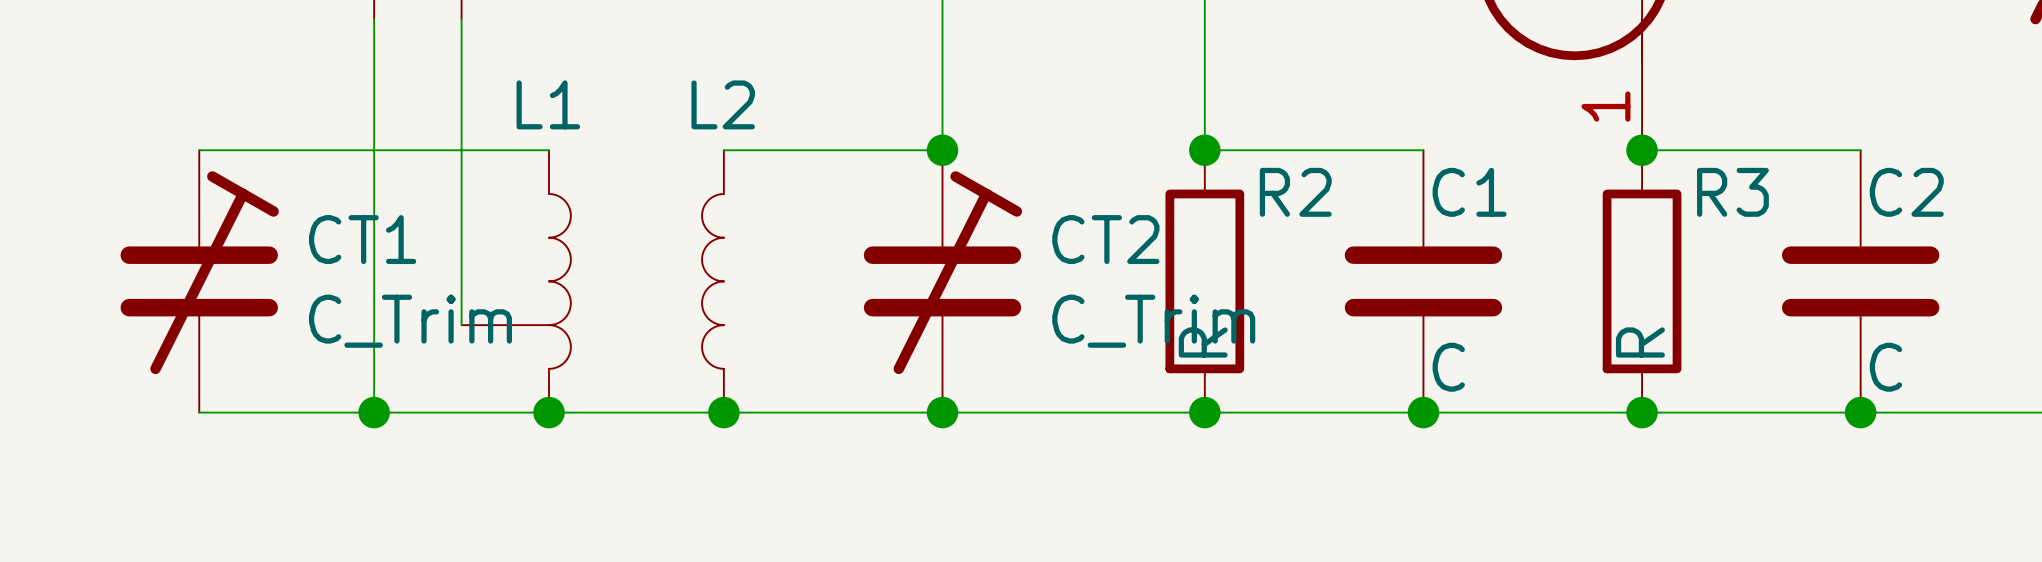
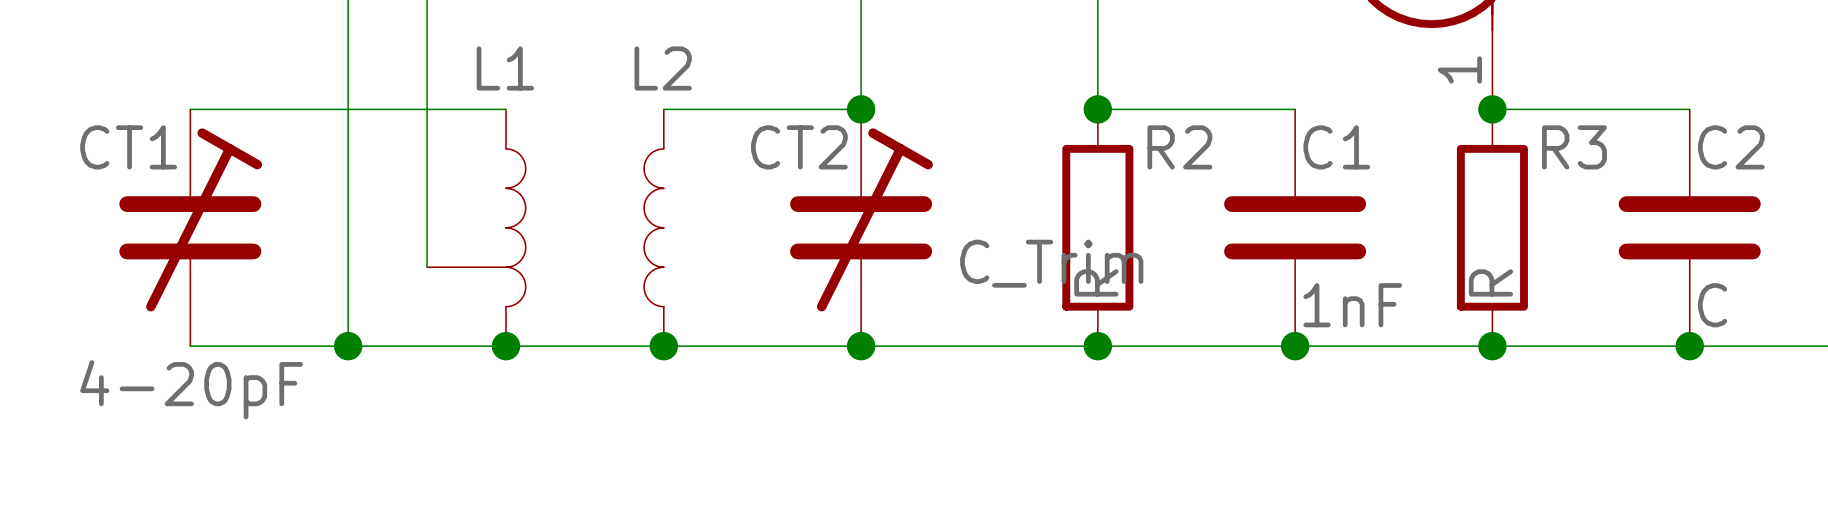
CT1 name position: CT1 (362, 239) -> CT1 (128, 147)
CT2 name position: CT2 (1105, 239) -> CT2 (799, 147)
CT1 value: C_Trim (410, 321) -> 4-20pF (191, 389)
C1 value: C (1448, 367) -> 1nF (1352, 305)

